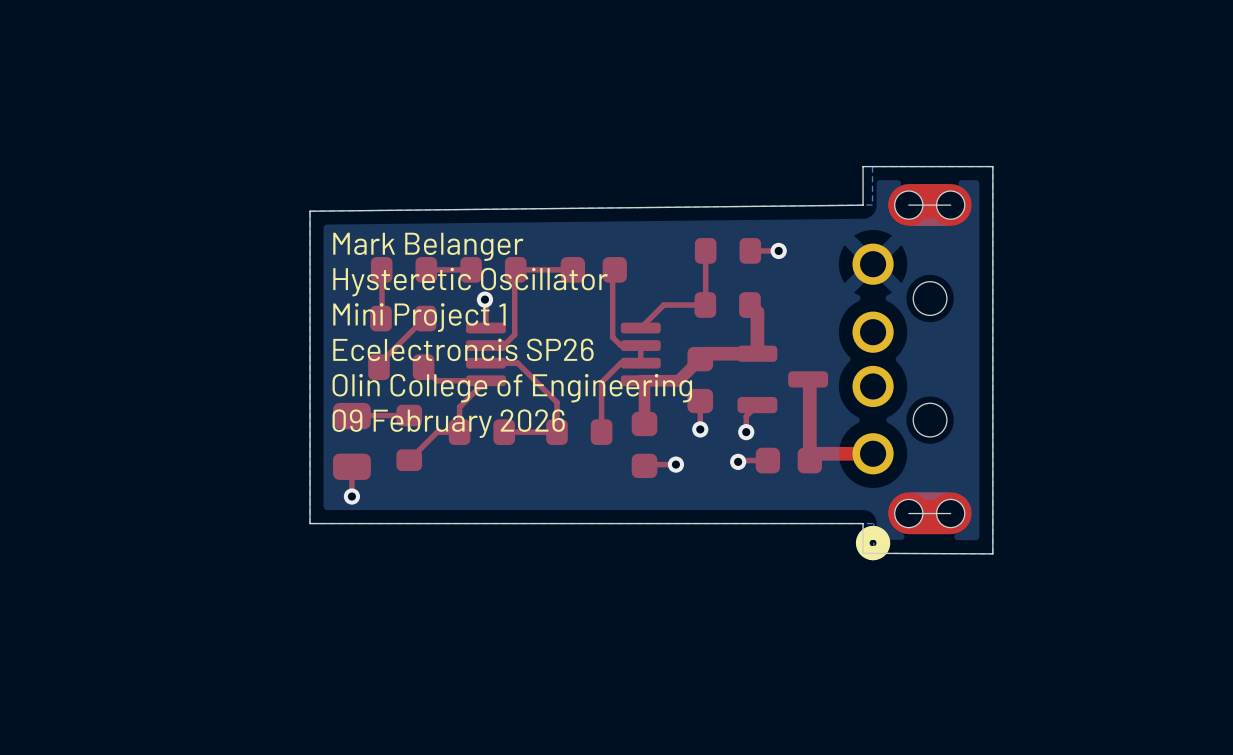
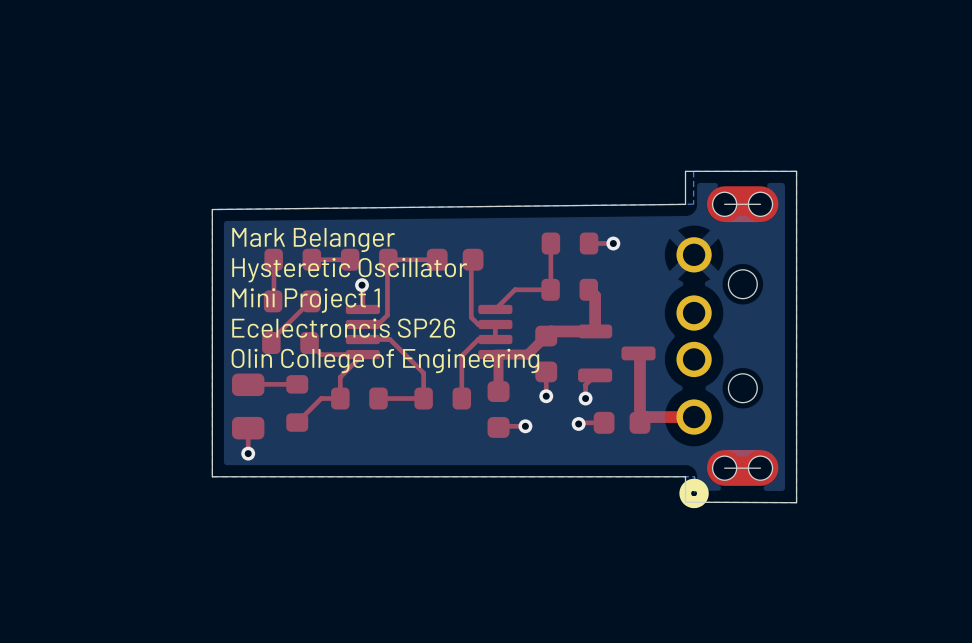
text: 09 February 2026 (448, 423) -> none

